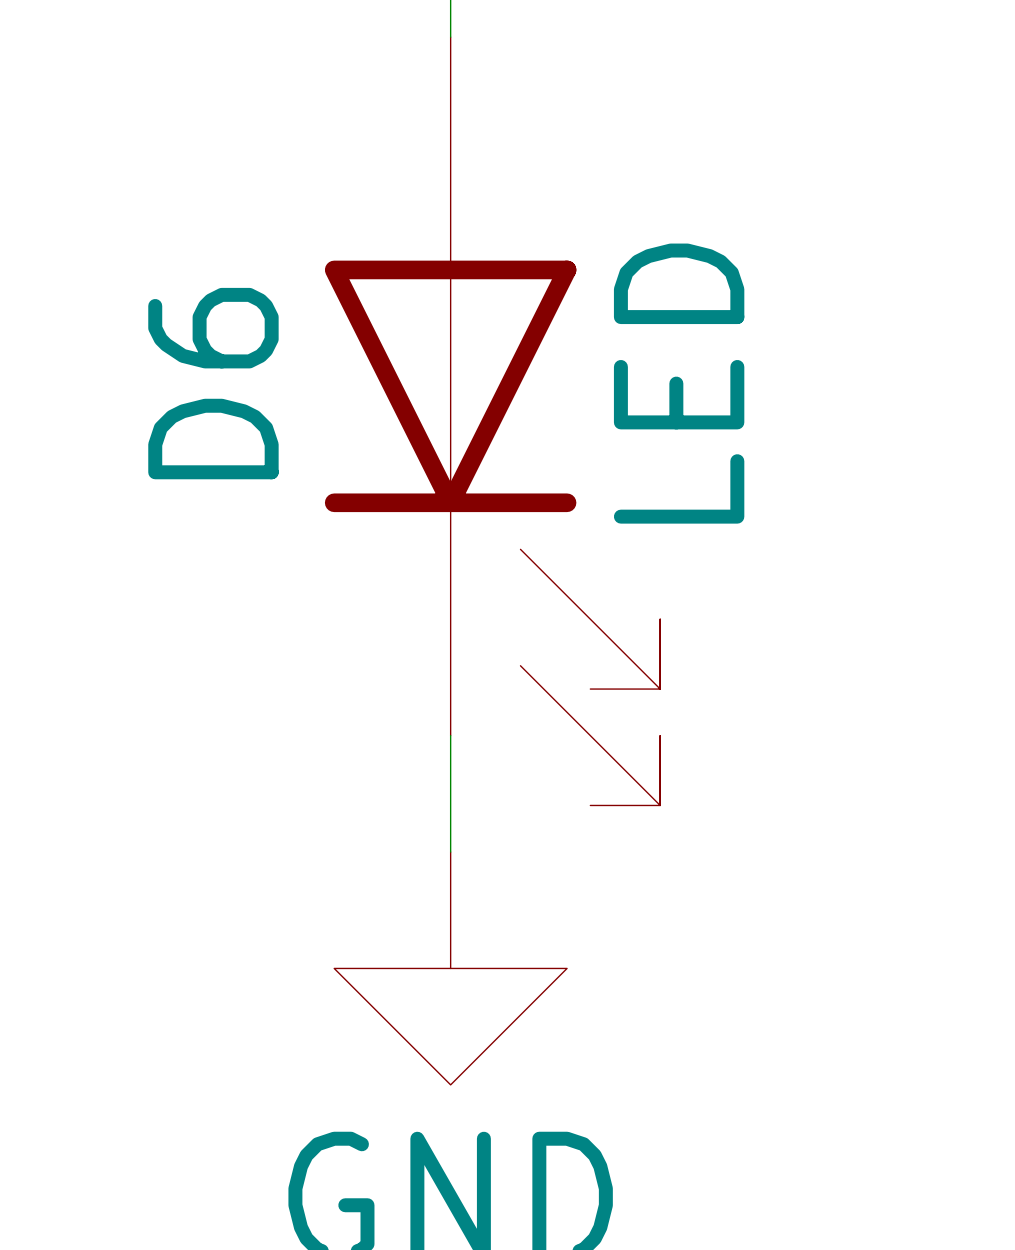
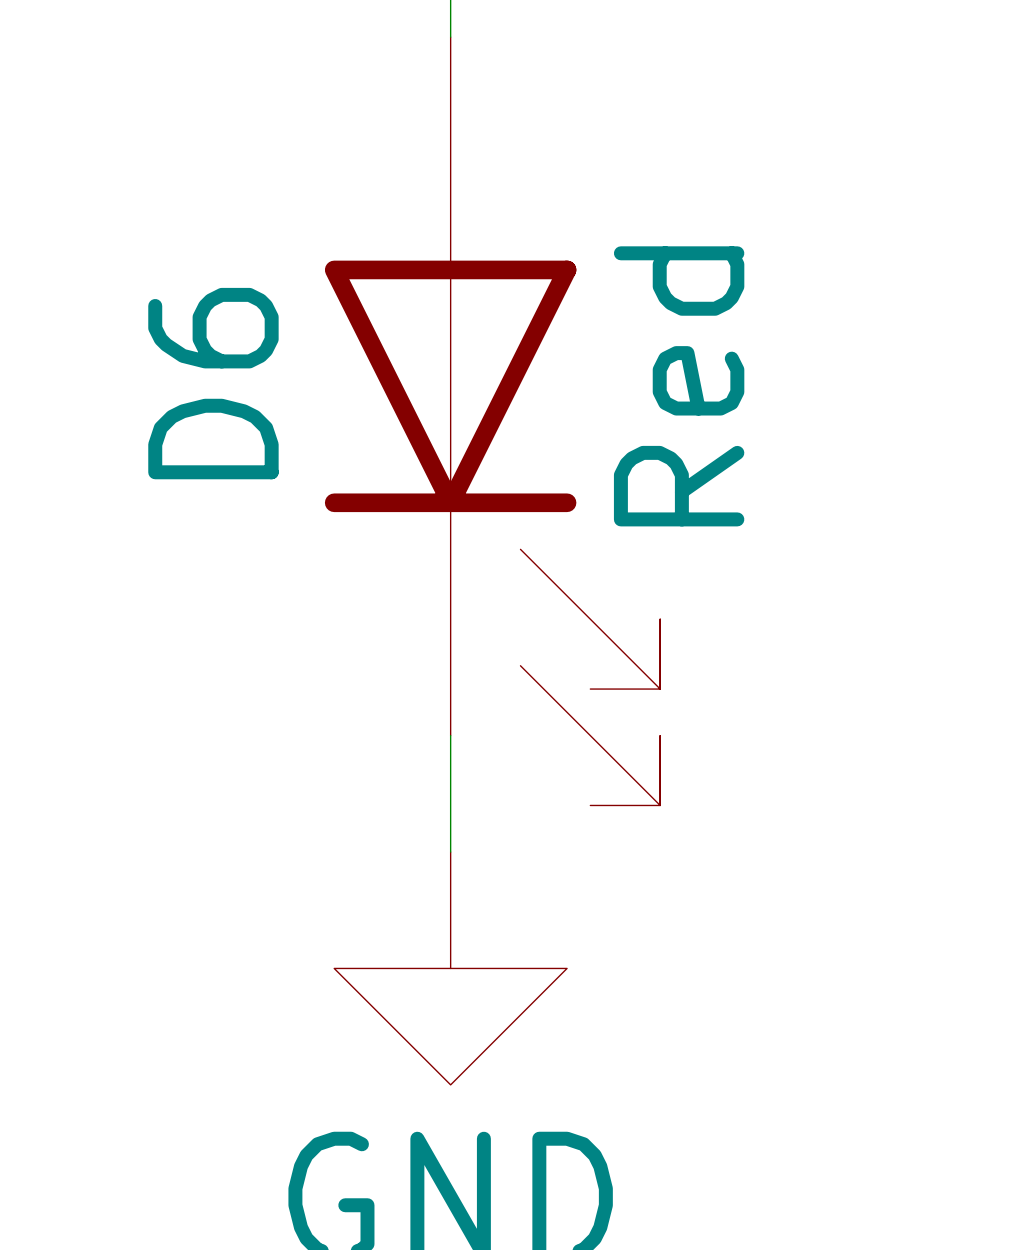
D6 value: LED (679, 383) -> Red (679, 386)

